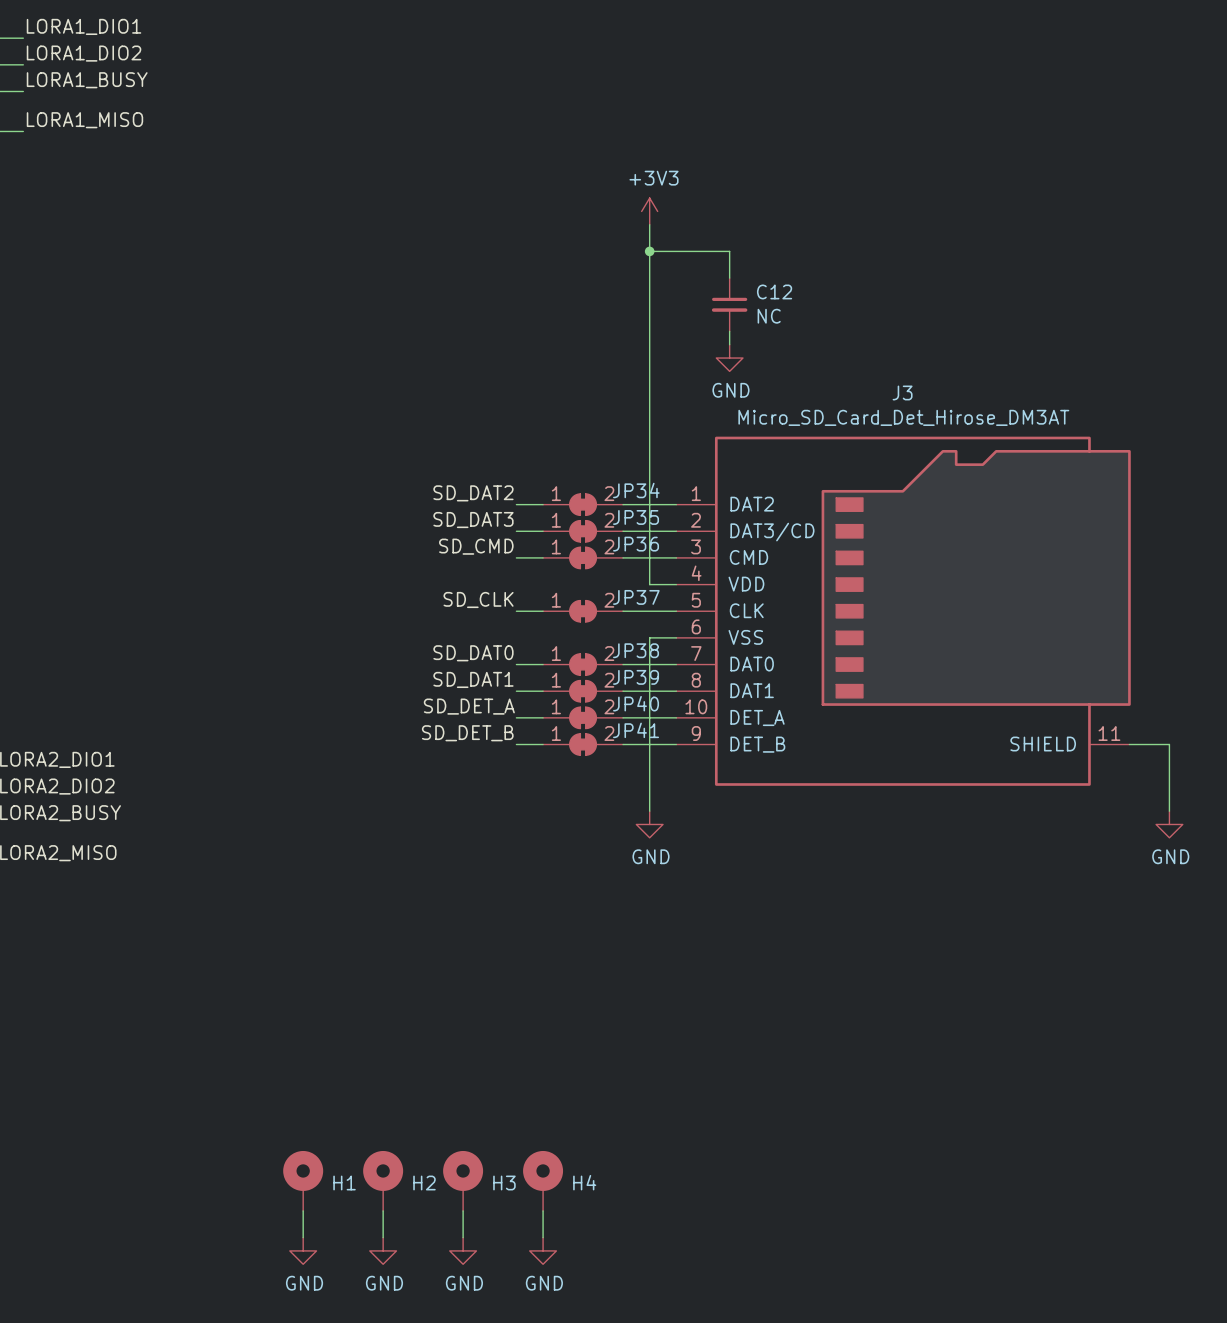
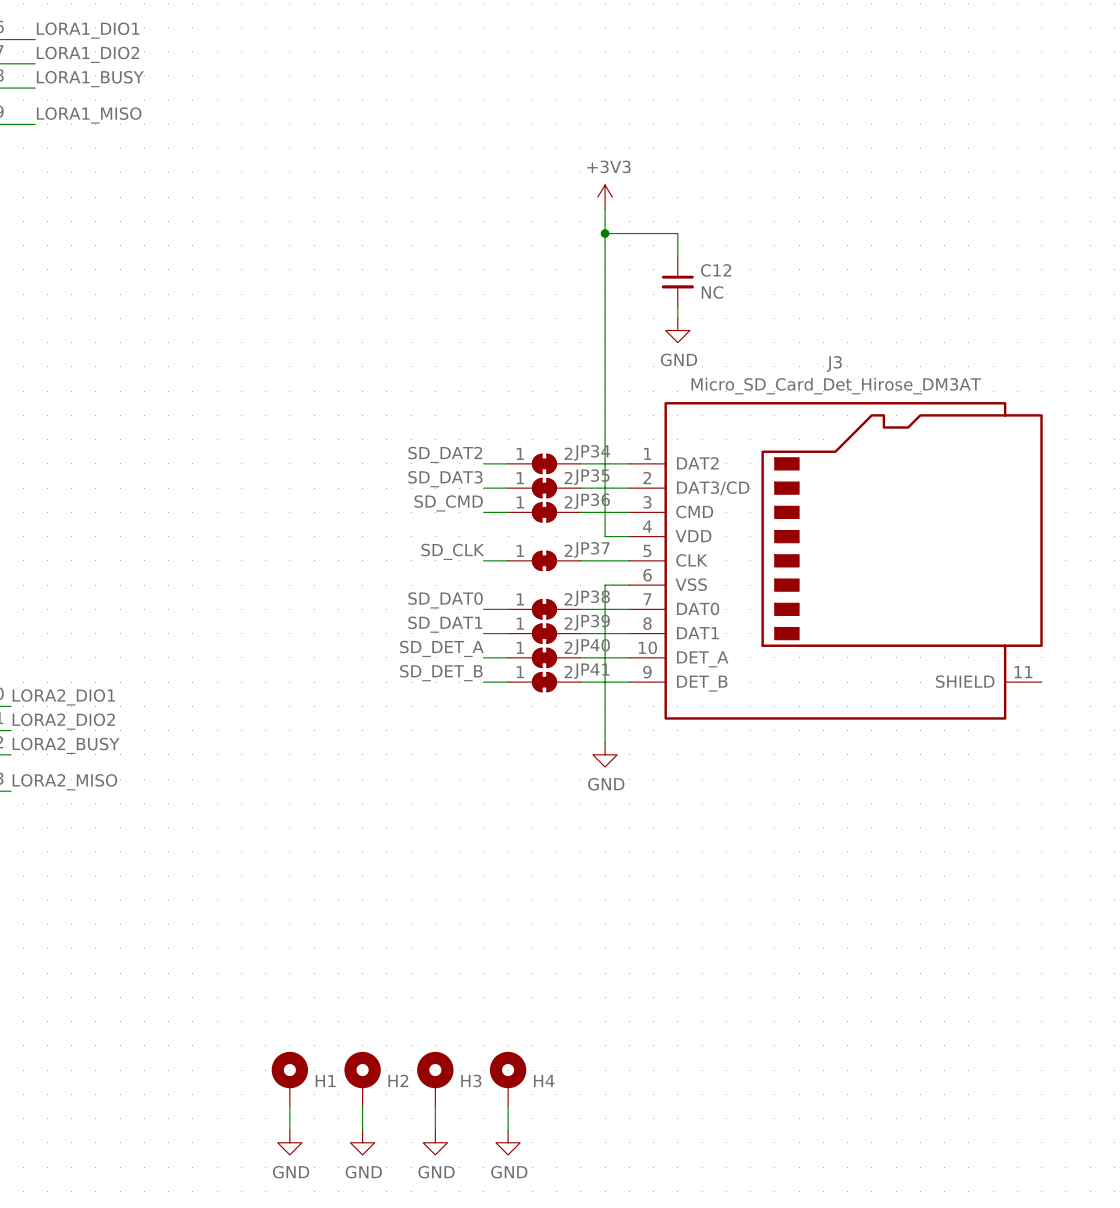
wire: (1129, 744) (1169, 744) (1169, 811) -> none
power symbol: GND (1169, 824) -> none

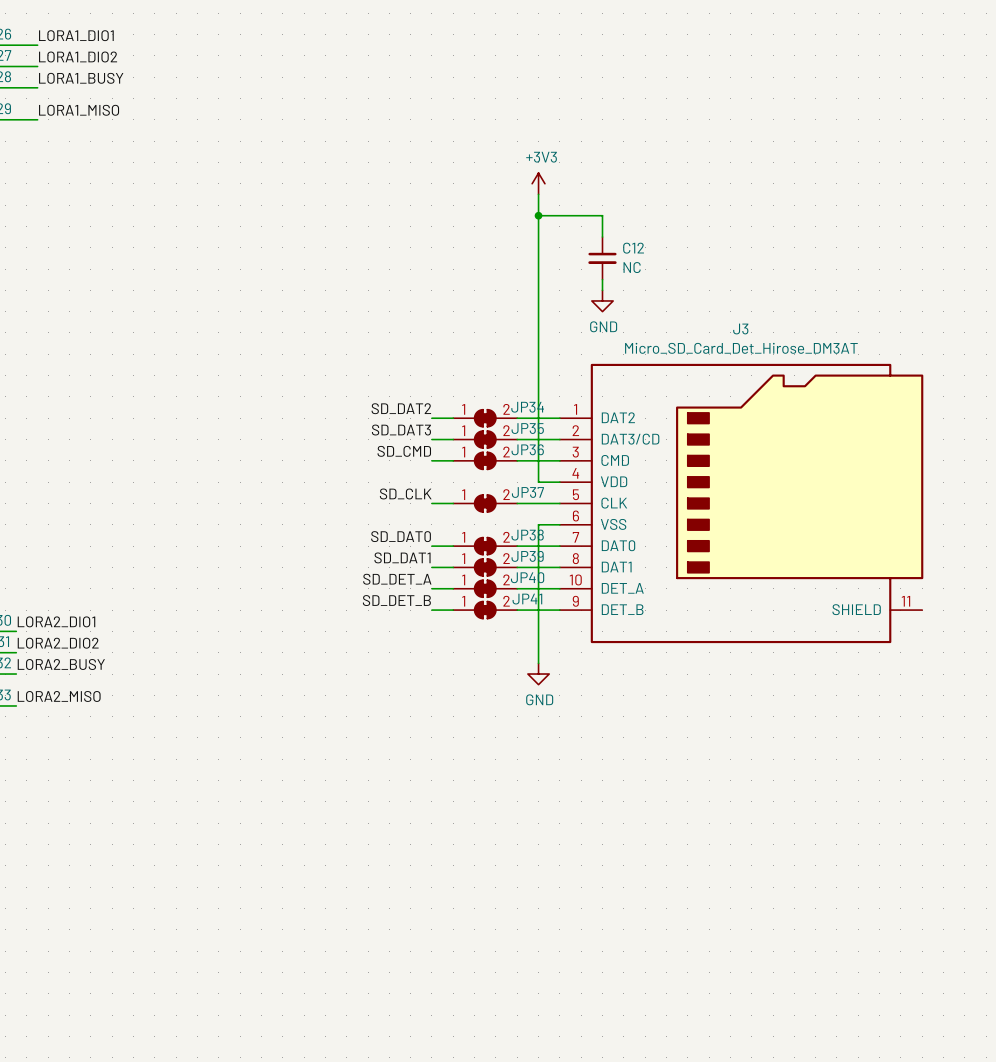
H1: (289, 1079) -> none
H2: (362, 1079) -> none
H3: (435, 1079) -> none
H4: (508, 1079) -> none
wire: (289, 1106) (289, 1130) -> none
wire: (362, 1106) (362, 1130) -> none
wire: (435, 1106) (435, 1130) -> none
wire: (508, 1106) (508, 1130) -> none
power symbol: GND (289, 1142) -> none
power symbol: GND (362, 1142) -> none
power symbol: GND (435, 1142) -> none
power symbol: GND (508, 1142) -> none

